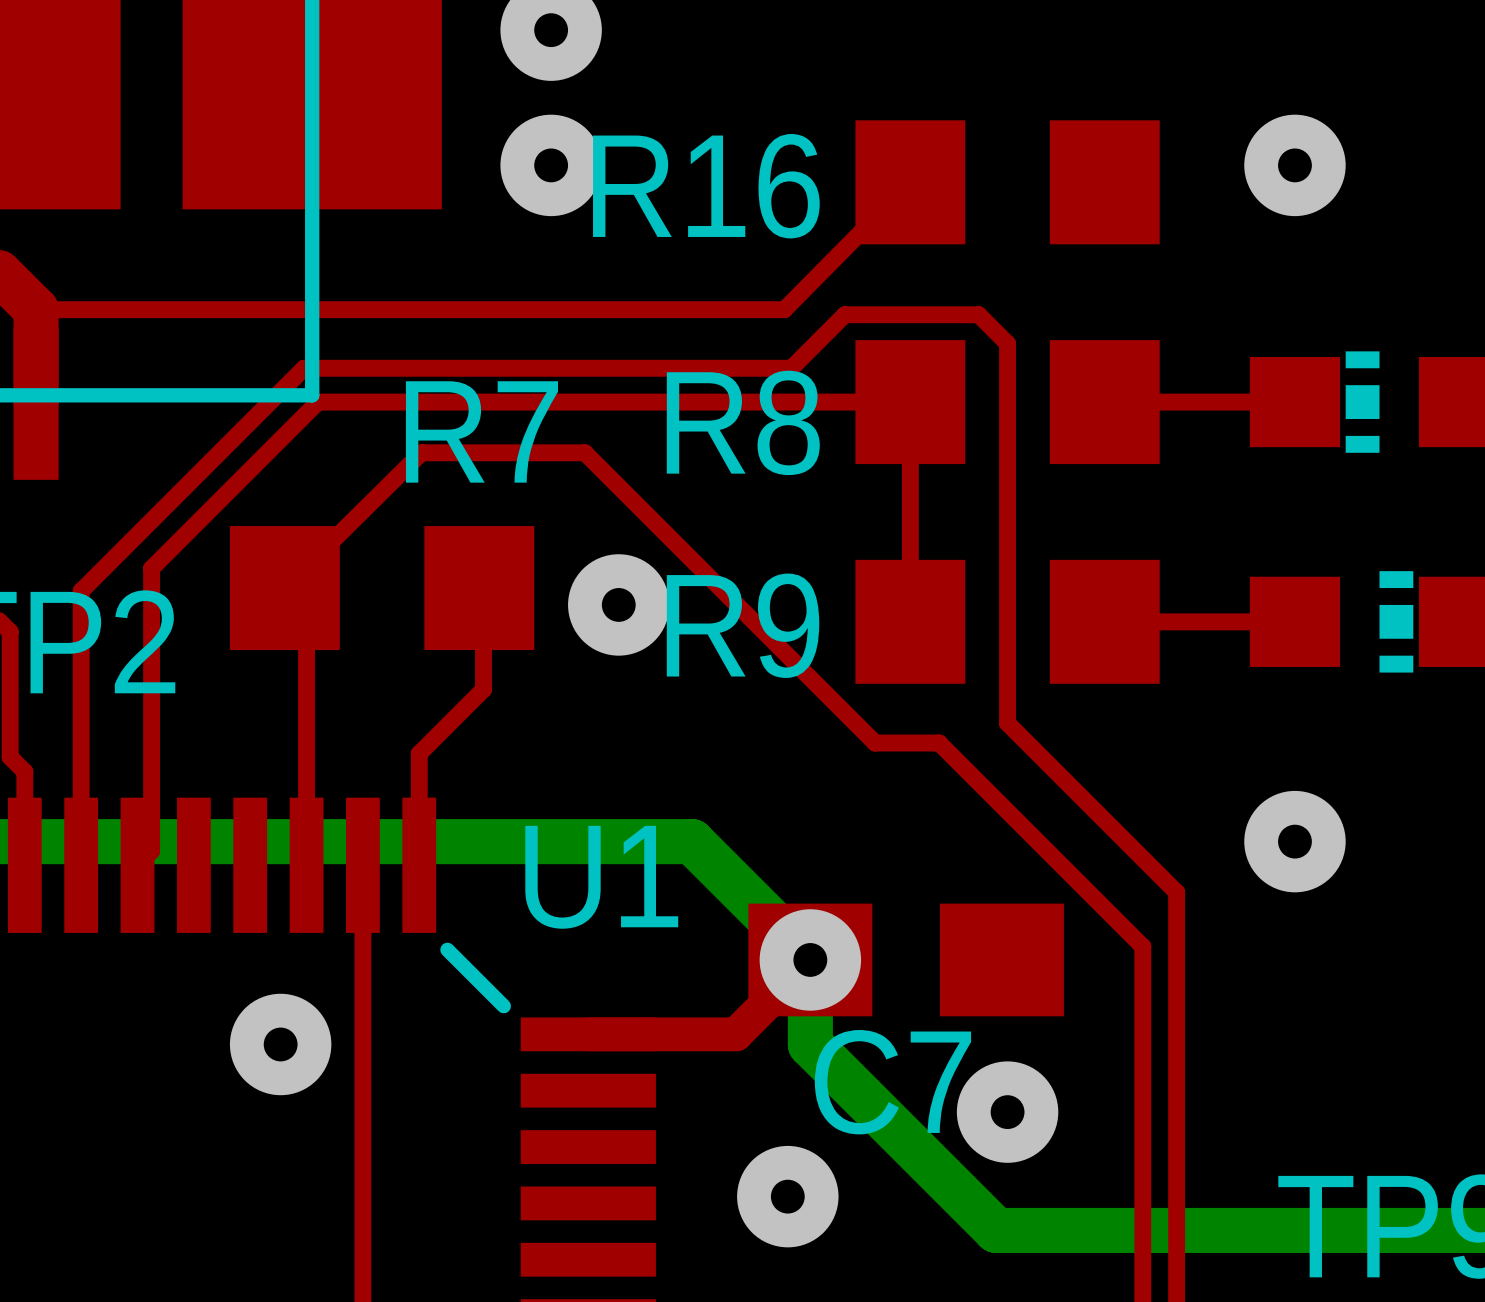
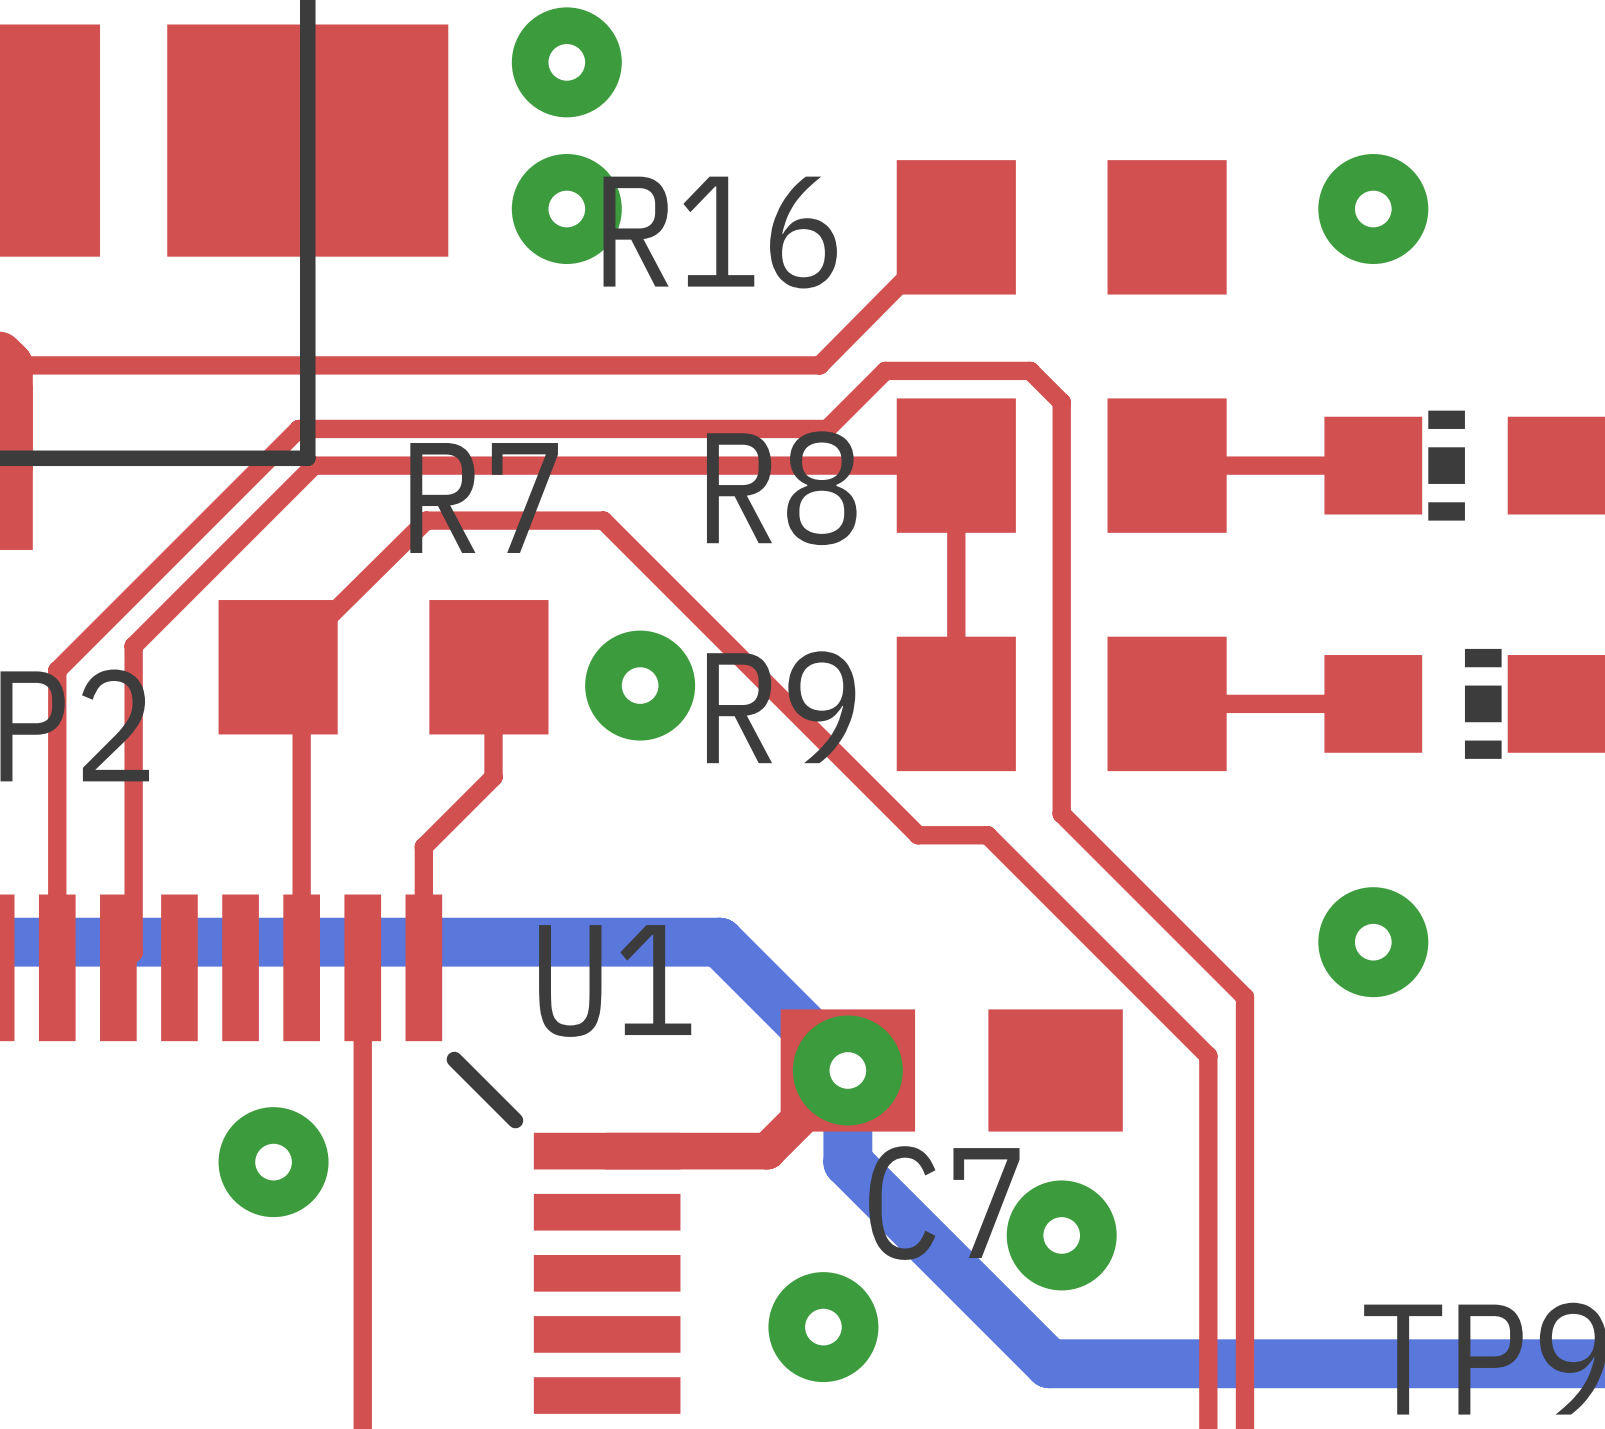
R16 name position: R16 (706, 186) -> R16 (720, 232)

